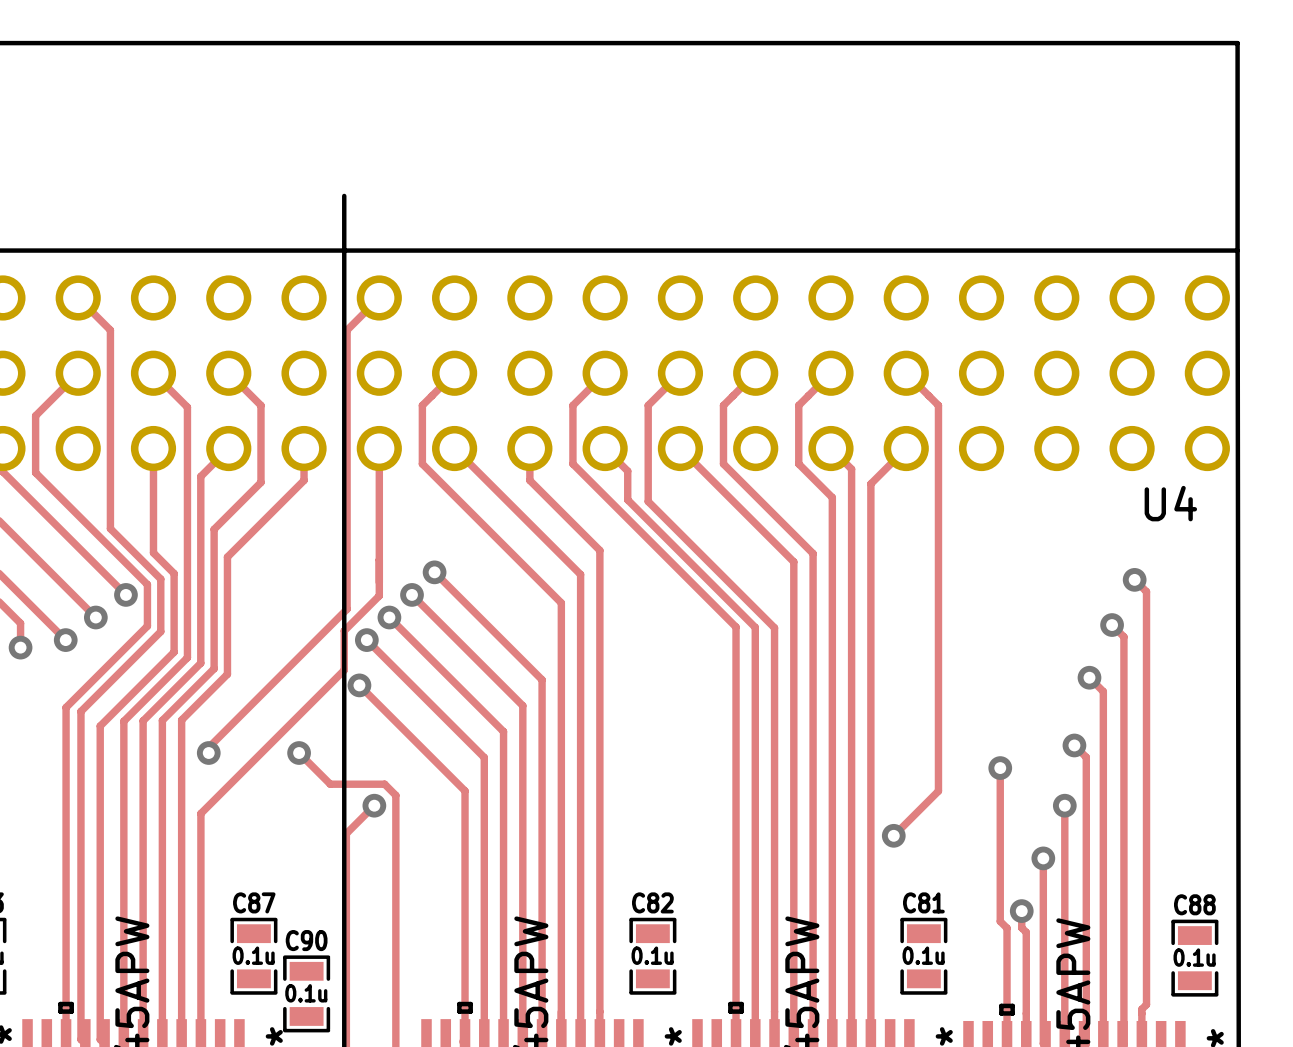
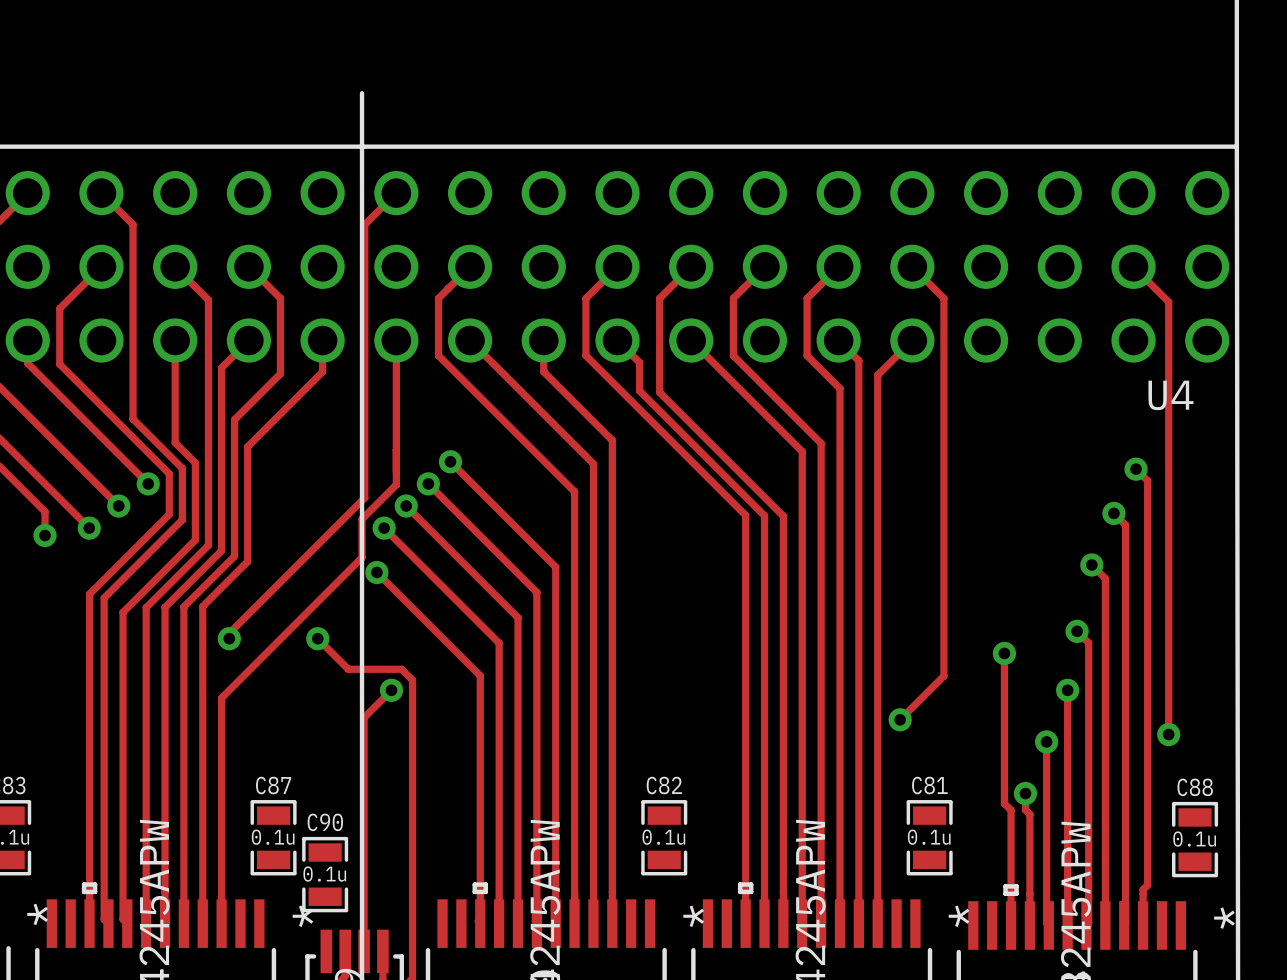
track: none -> (1133, 266) (1168, 301) (1168, 734)
via: none -> (1168, 734)

